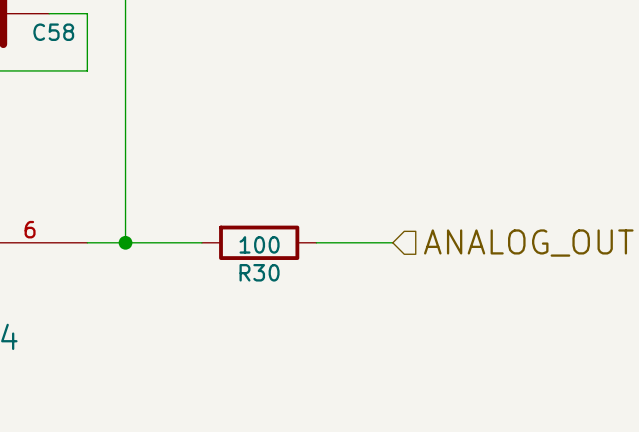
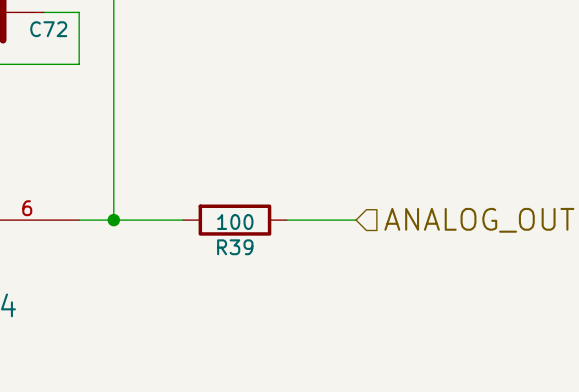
C58 name: C58 (53, 32) -> C72 (48, 29)
R30 name: R30 (259, 272) -> R39 (235, 247)

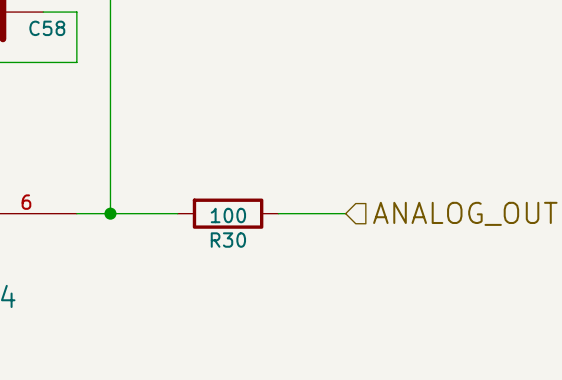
C72 name: C72 (48, 29) -> C58 (47, 28)
R39 name: R39 (235, 247) -> R30 (228, 240)

